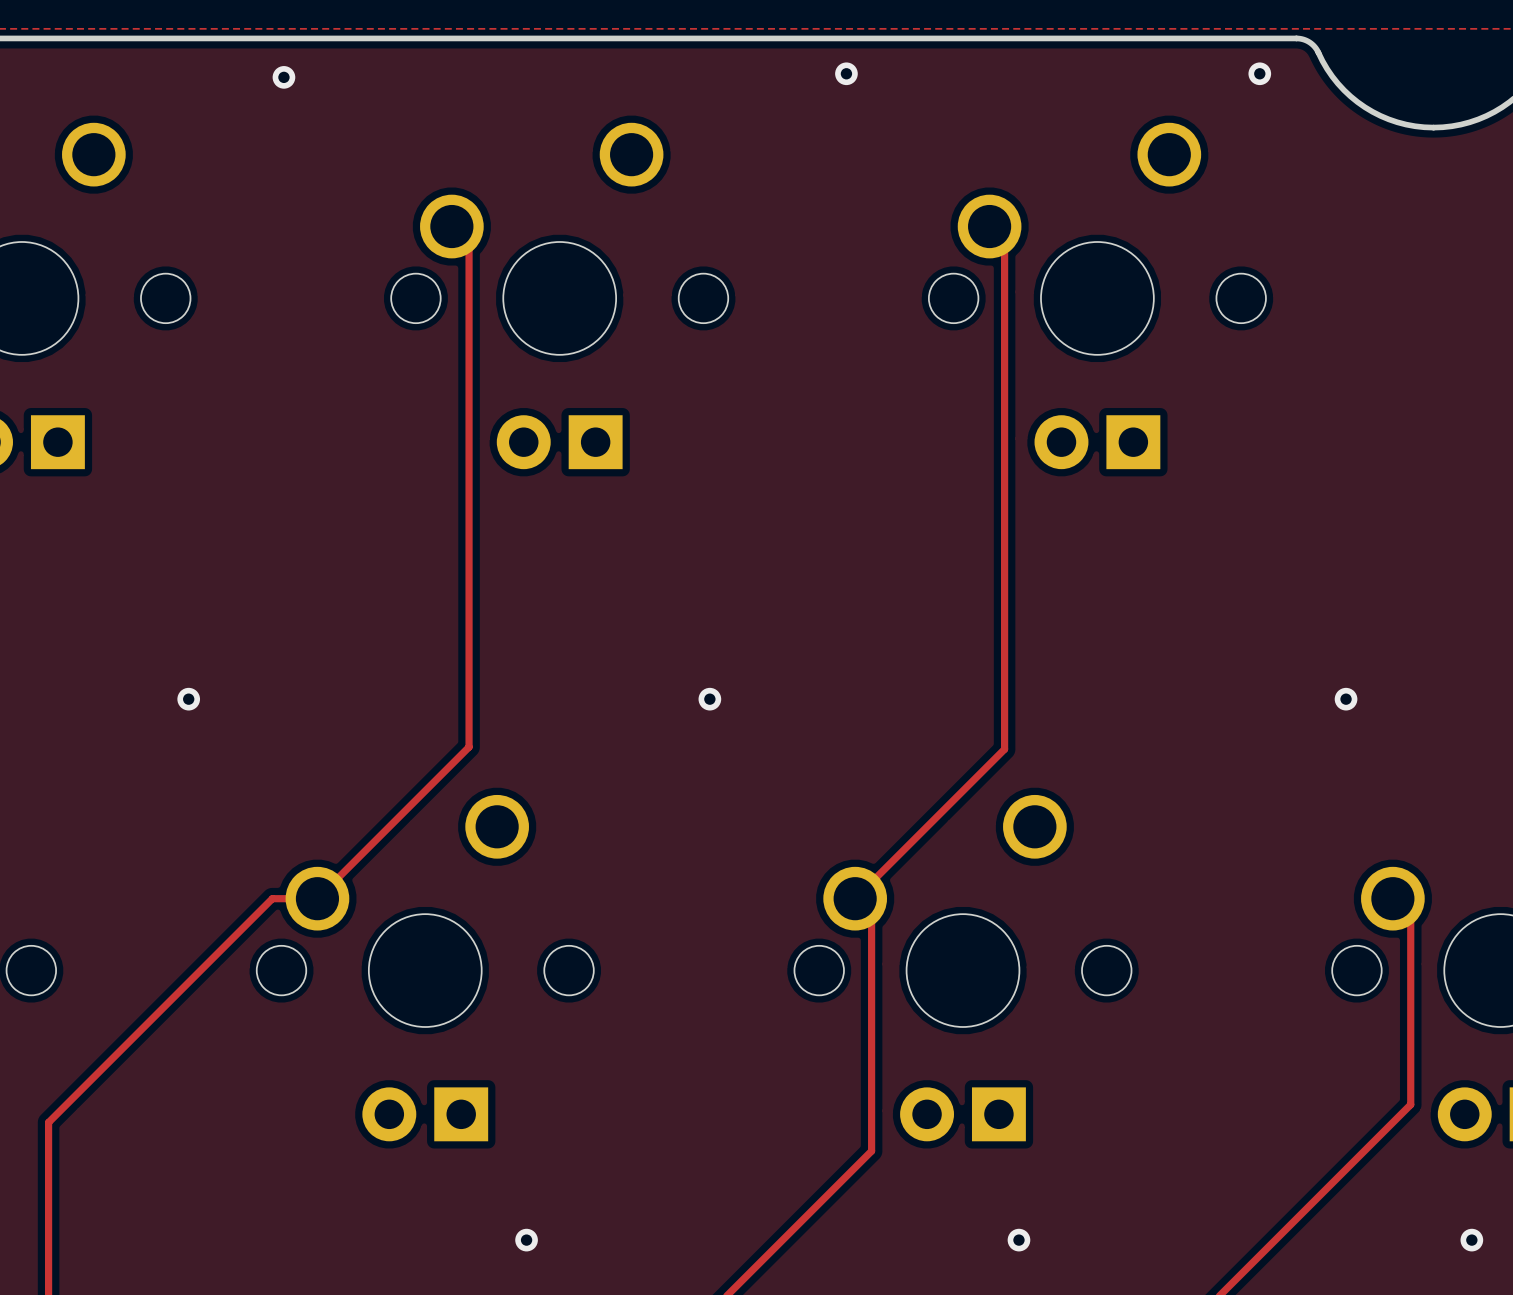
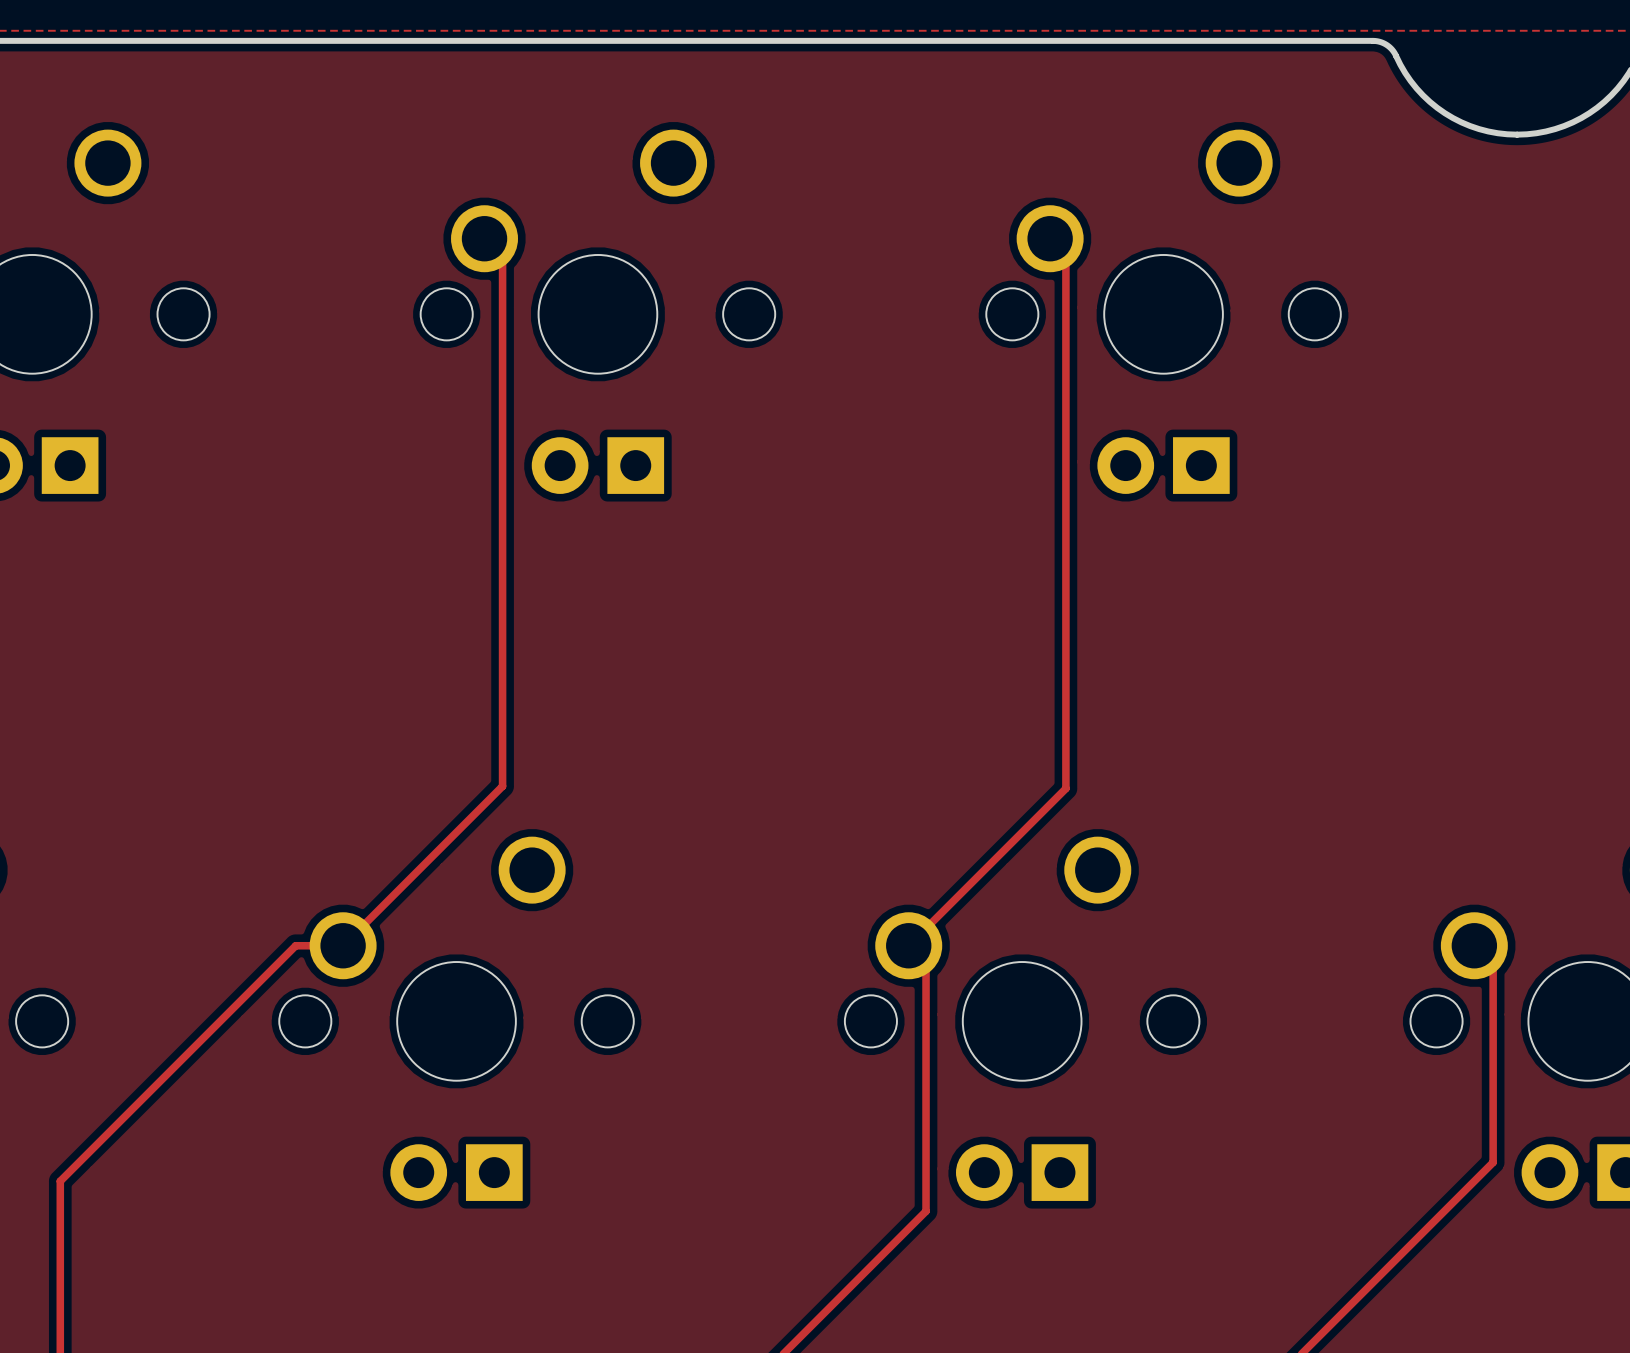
via: (846, 73) -> none
via: (1259, 73) -> none
via: (283, 77) -> none
via: (188, 699) -> none
via: (709, 699) -> none
via: (1346, 699) -> none
via: (526, 1240) -> none
via: (1018, 1240) -> none
via: (1471, 1240) -> none

